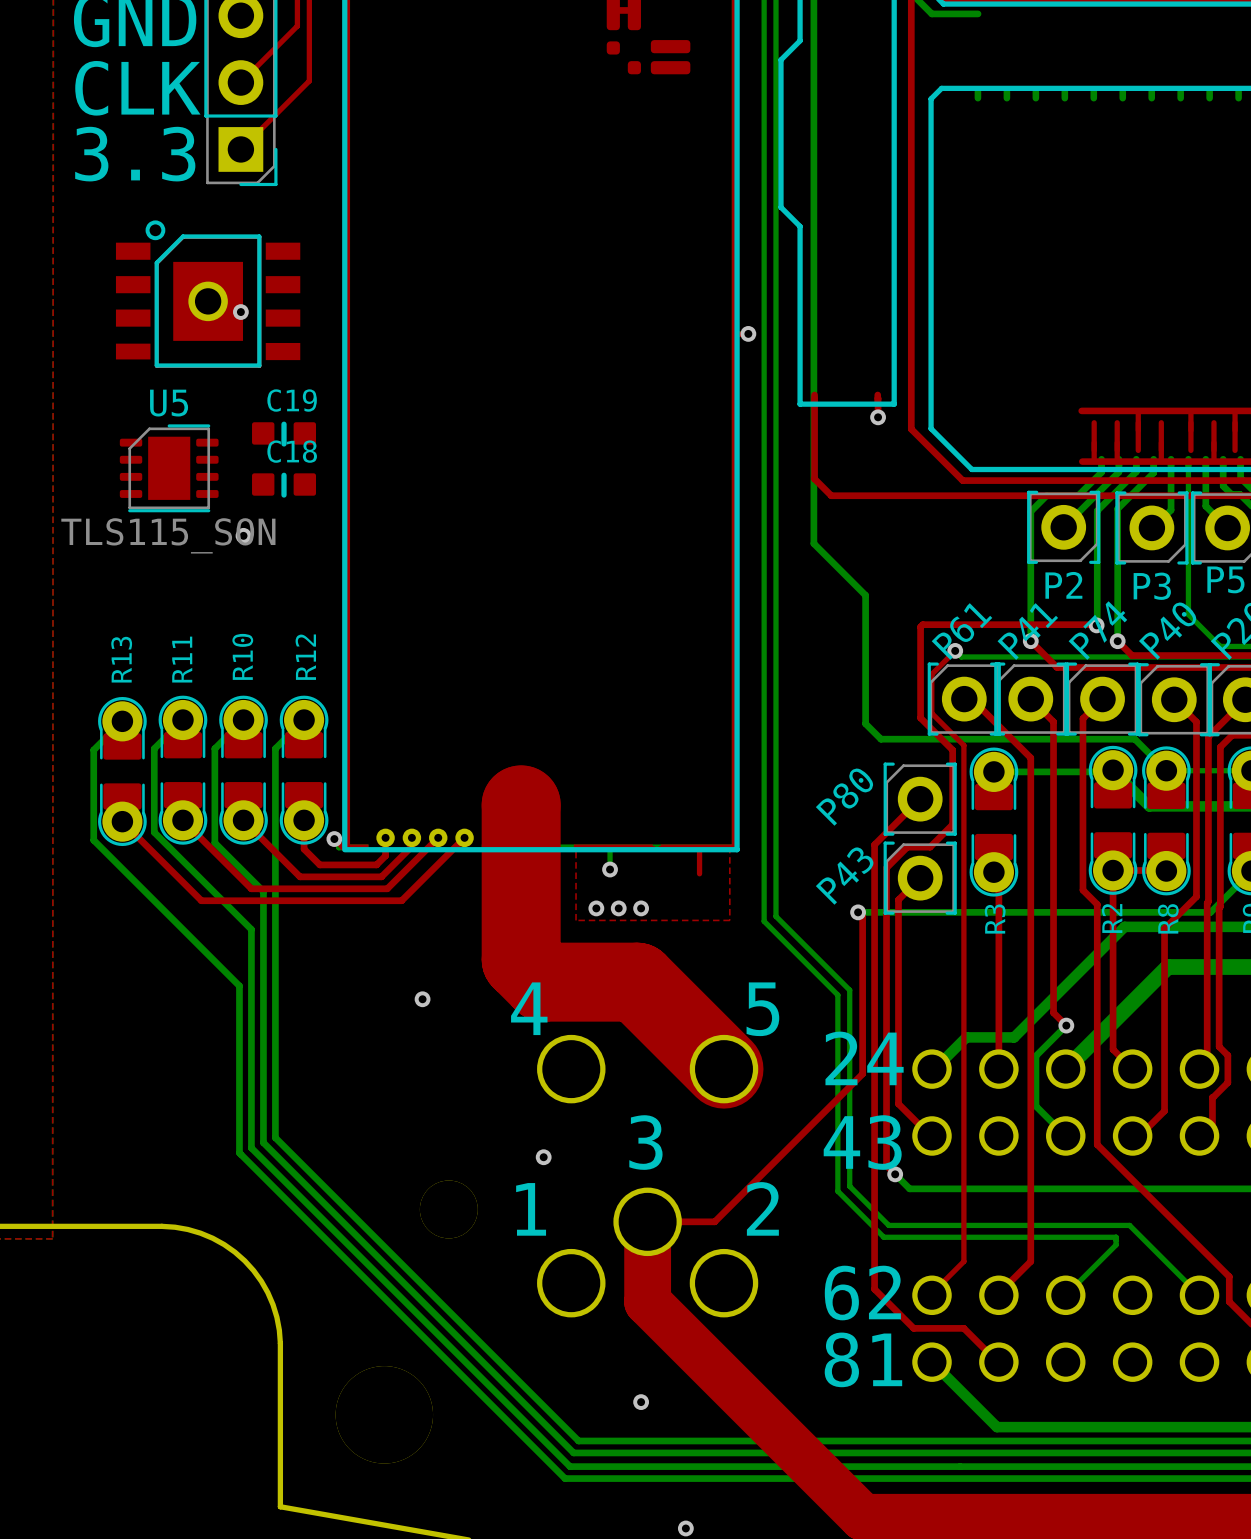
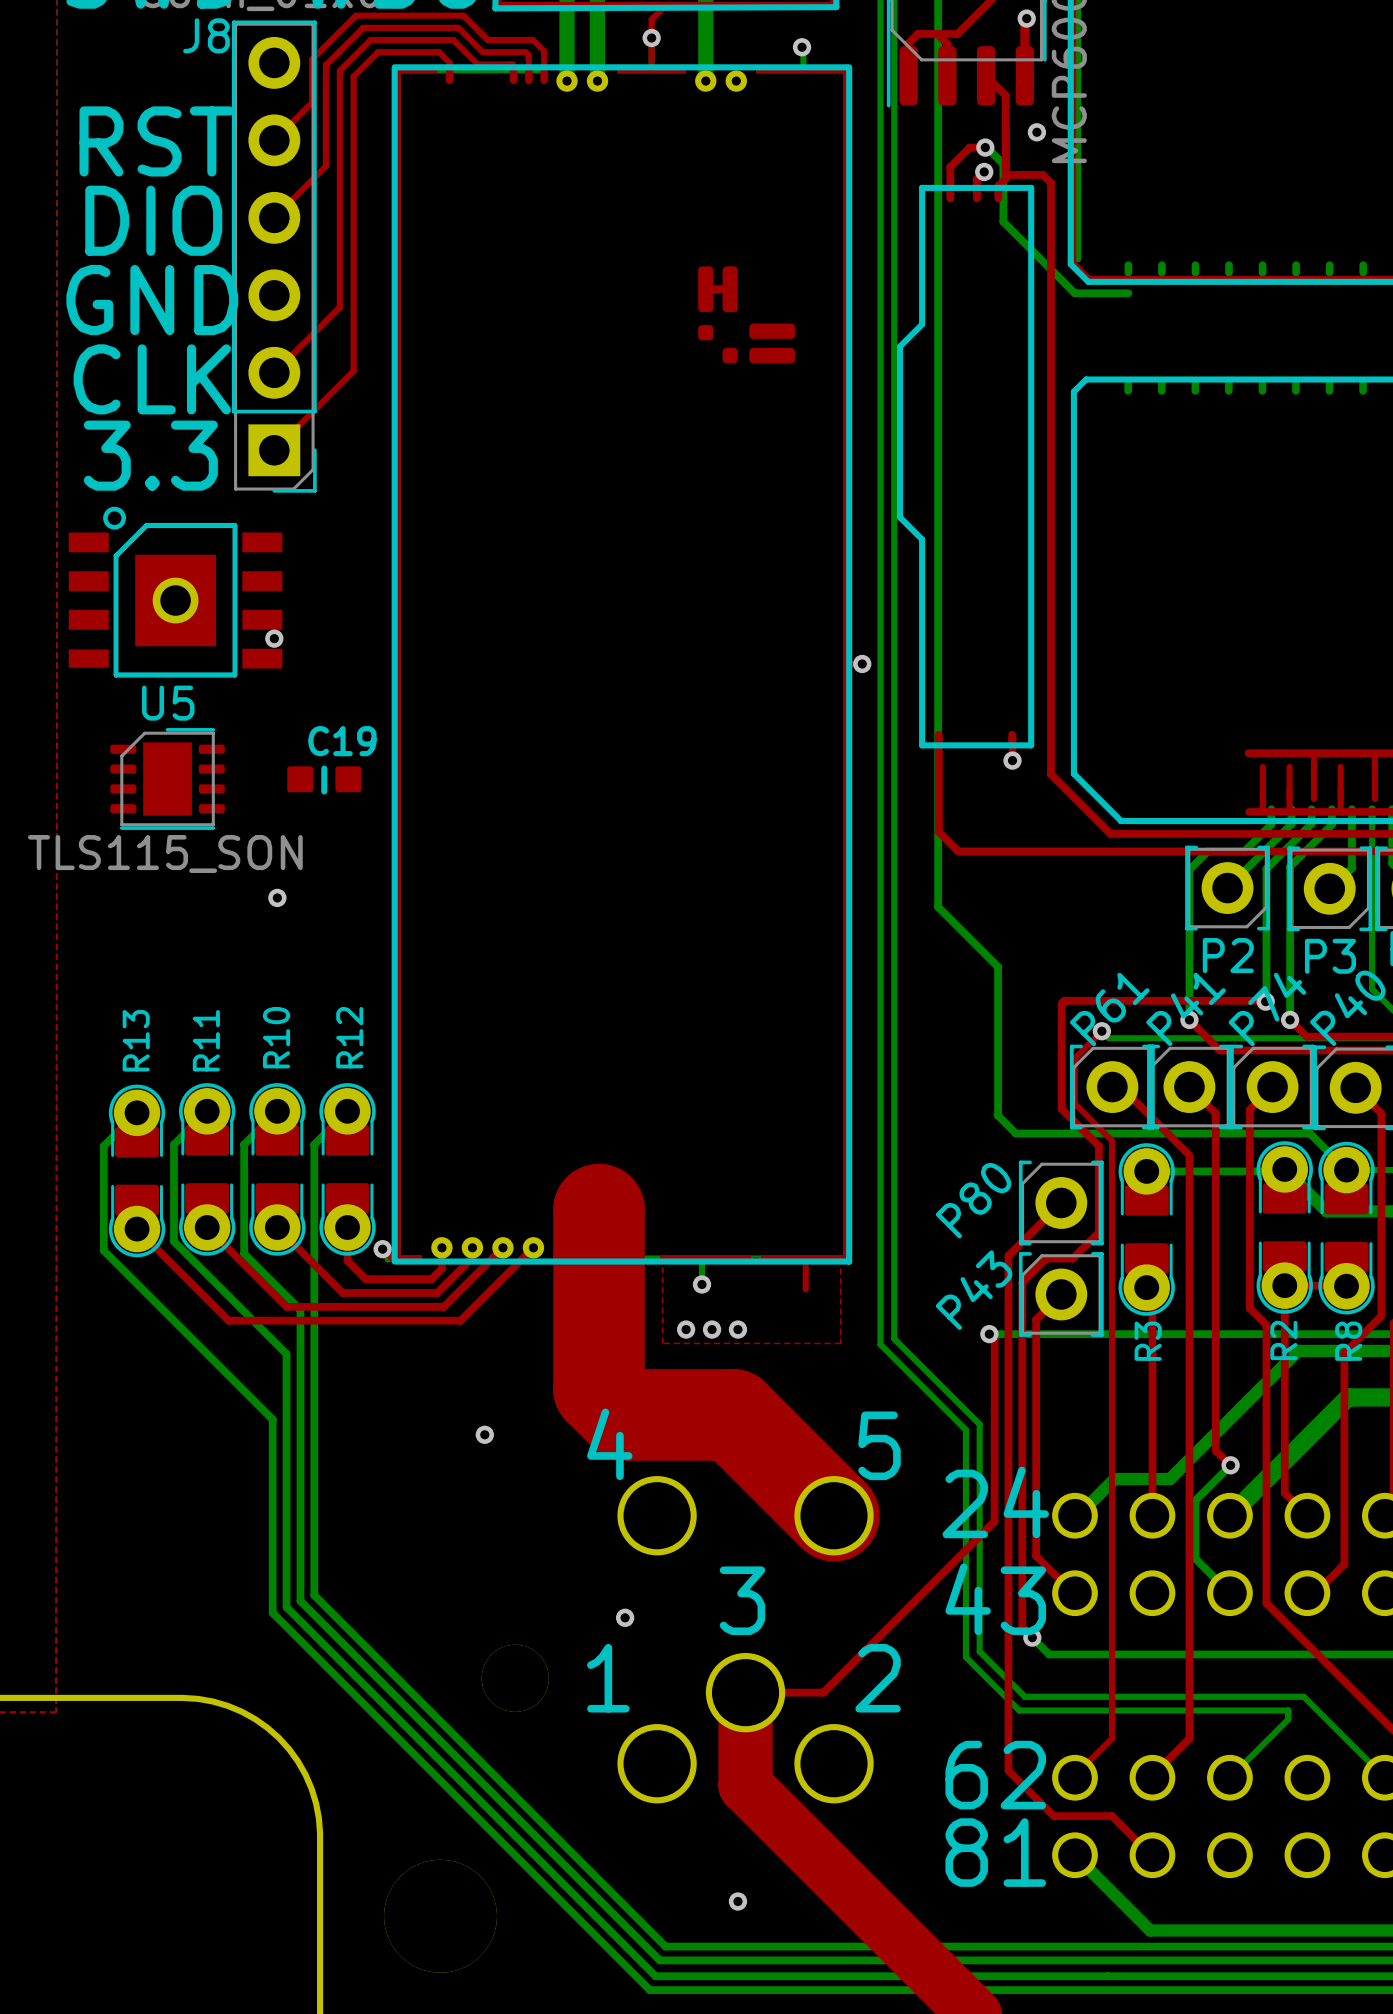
part position: (208, 294) -> (175, 592)
U5 position: (169, 468) -> (167, 778)
C18: (284, 485) -> none

